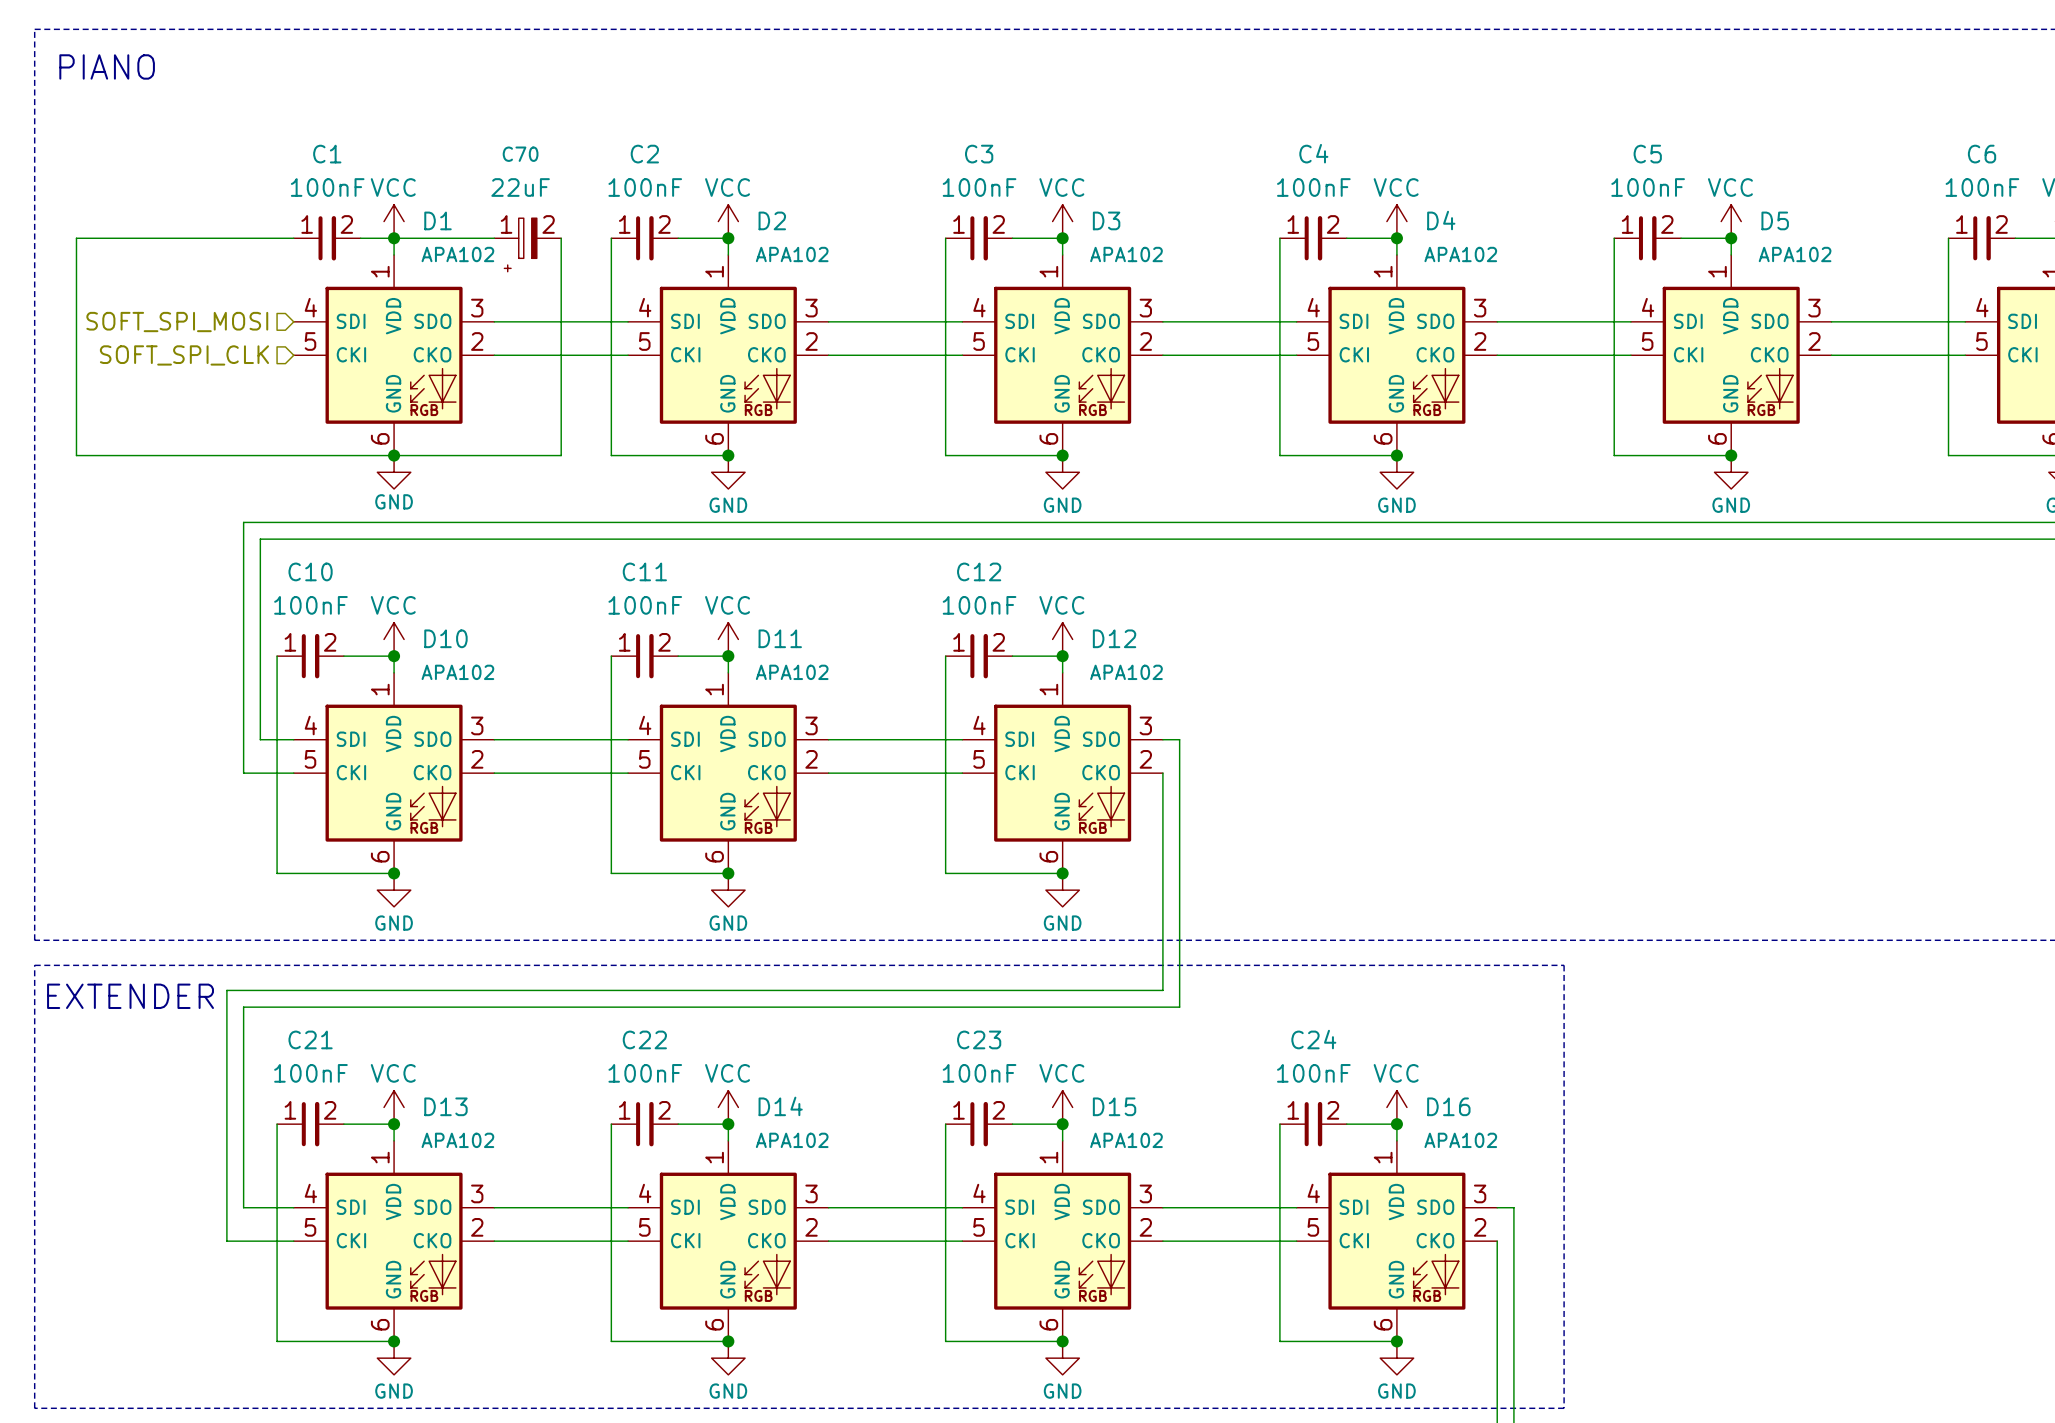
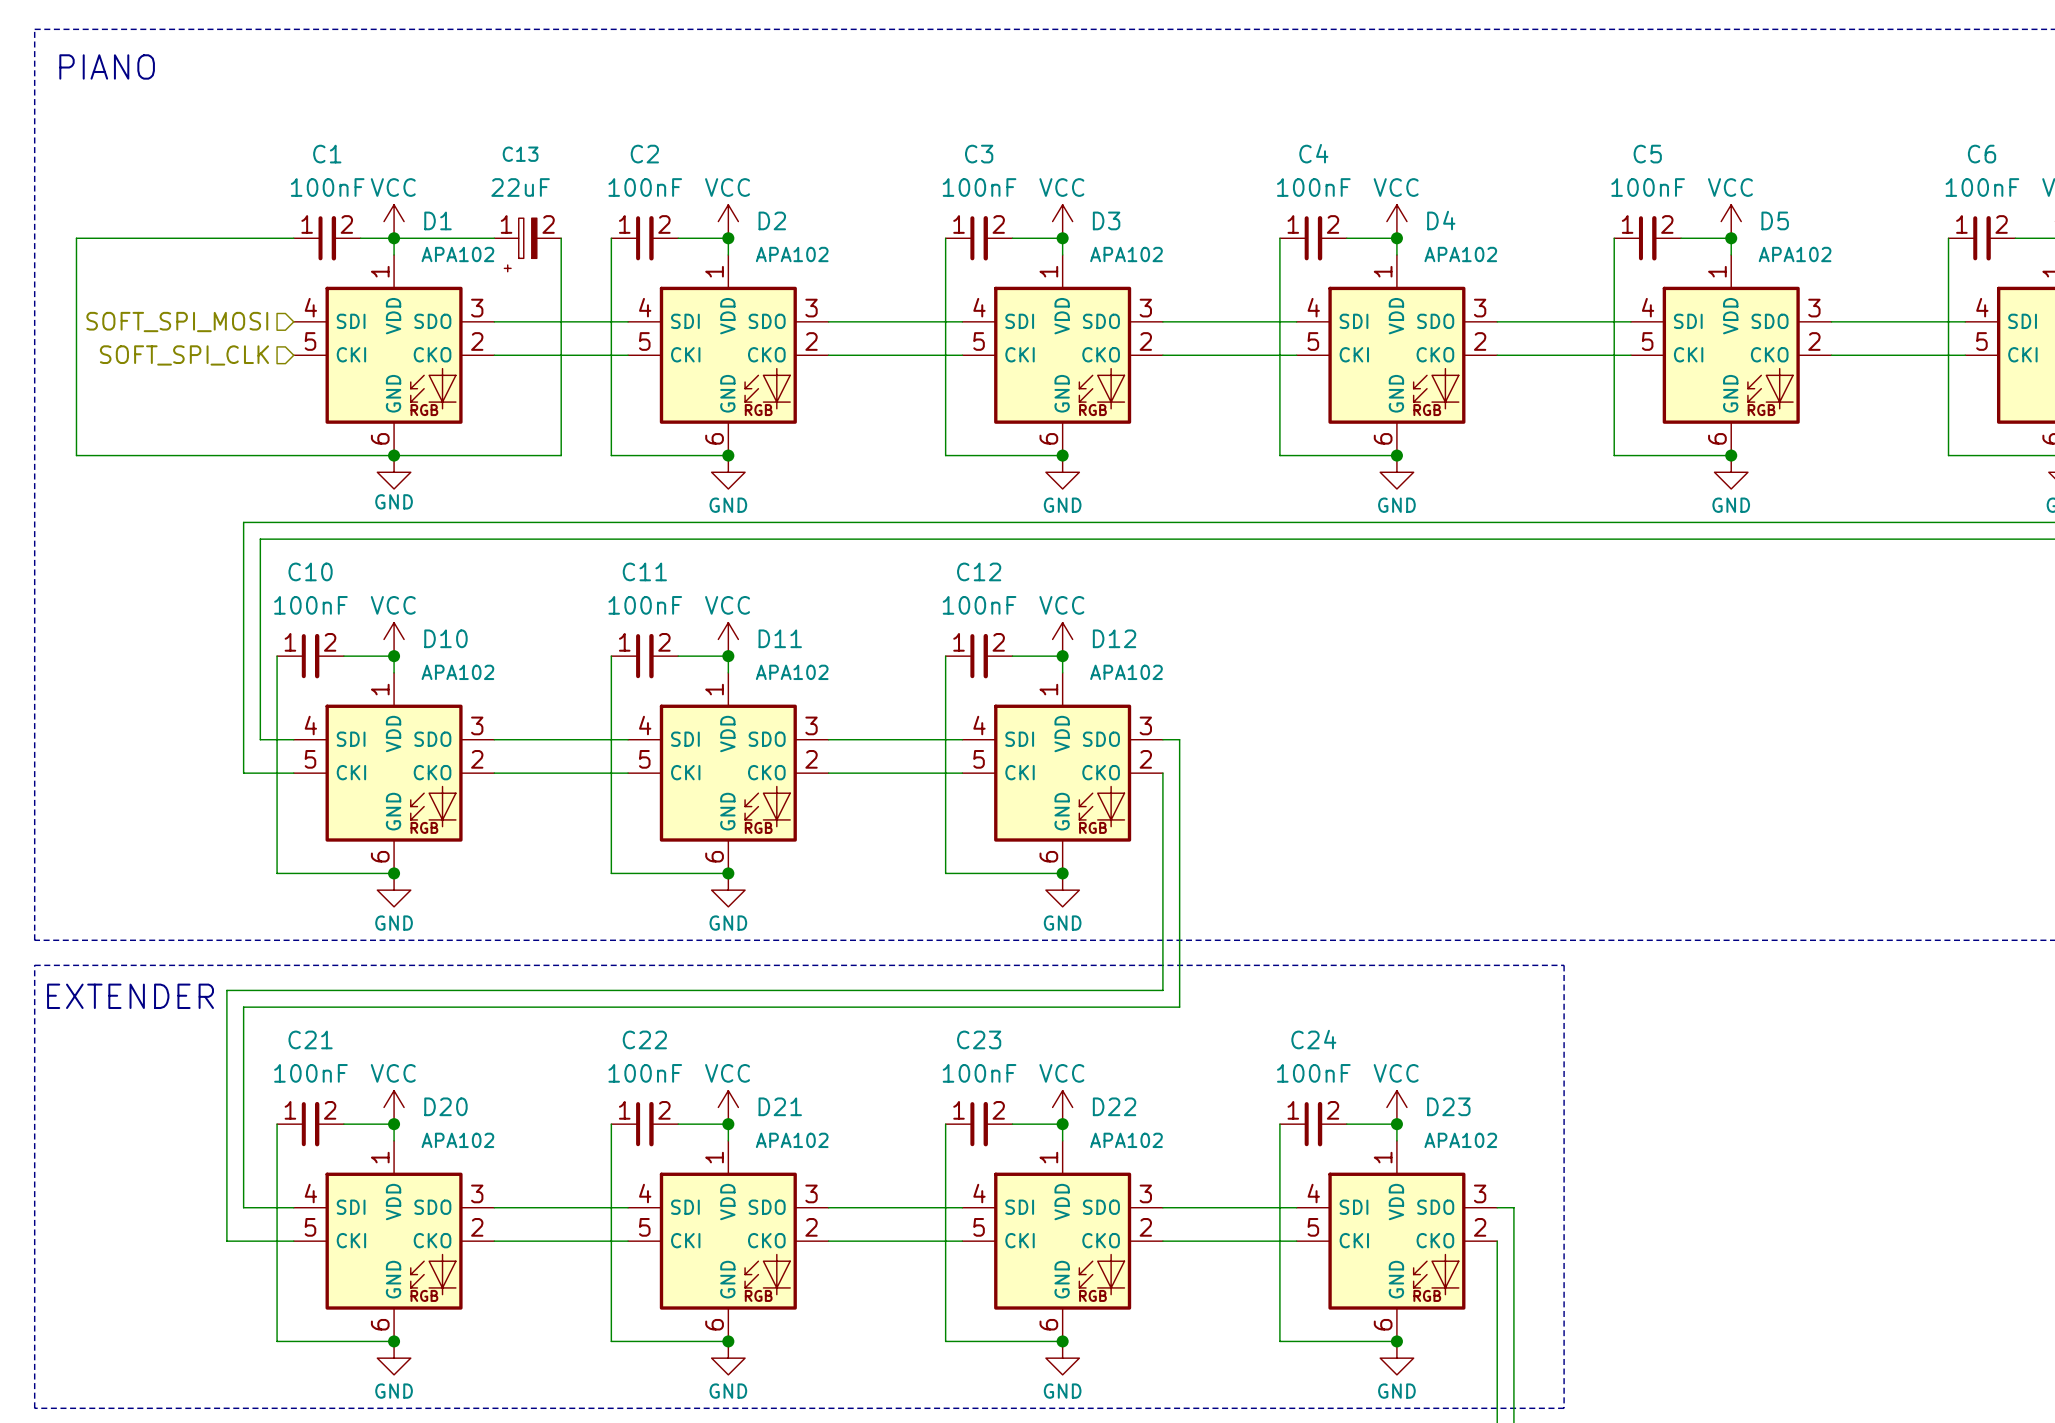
C70 name: C70 (520, 154) -> C13 (520, 154)
D13 name: D13 (445, 1106) -> D20 (445, 1106)
D14 name: D14 (780, 1106) -> D21 (780, 1106)
D15 name: D15 (1114, 1106) -> D22 (1114, 1106)
D16 name: D16 (1448, 1106) -> D23 (1448, 1106)

